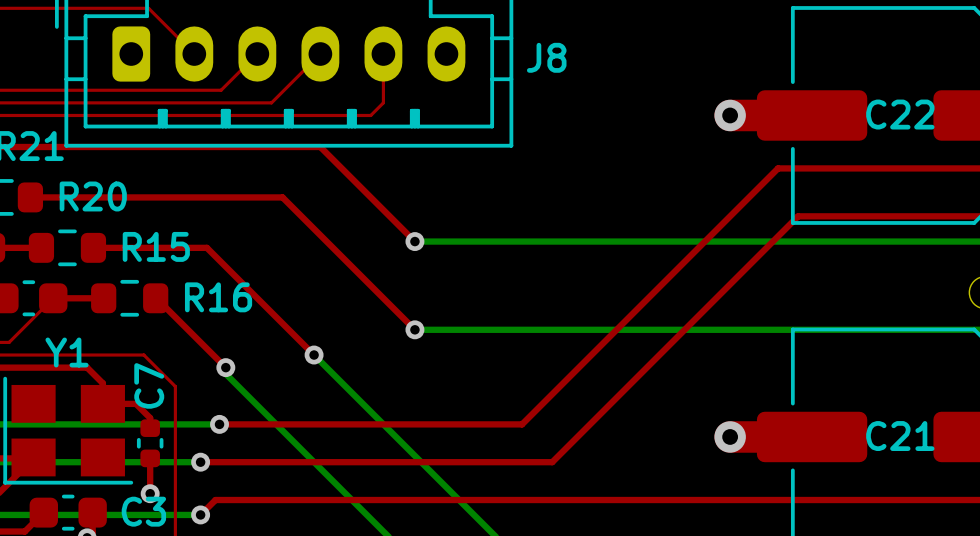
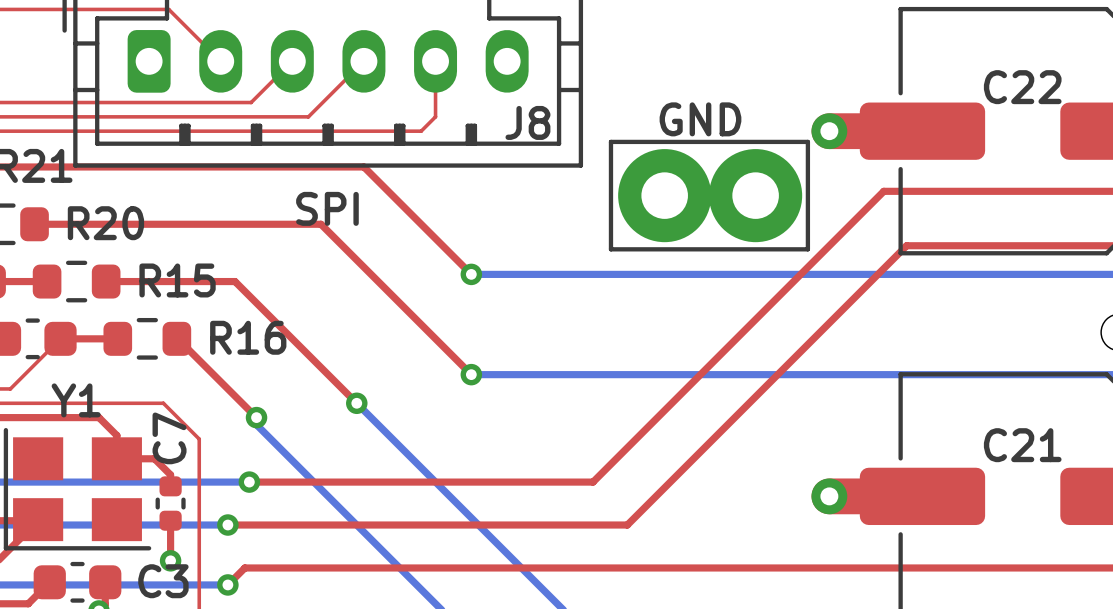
J8 name position: J8 (546, 57) -> J8 (527, 122)
C22 name position: C22 (900, 114) -> C22 (1022, 87)
part: none -> GND (709, 195)
text: none -> SPI (327, 208)
C21 name position: C21 (900, 436) -> C21 (1022, 445)

